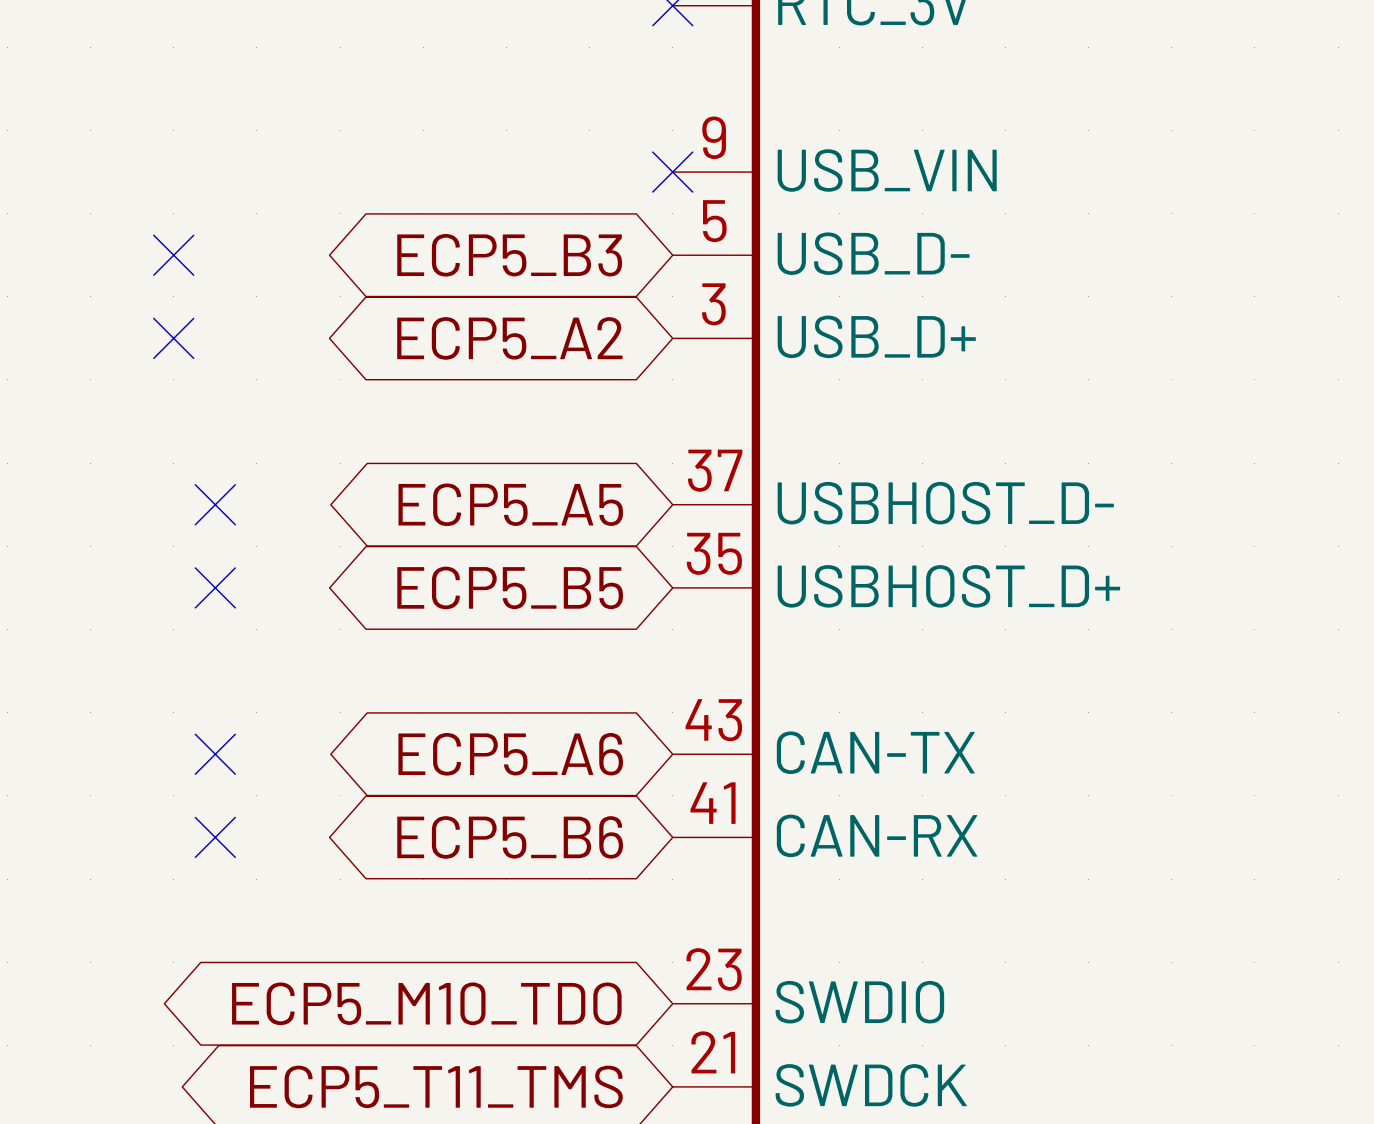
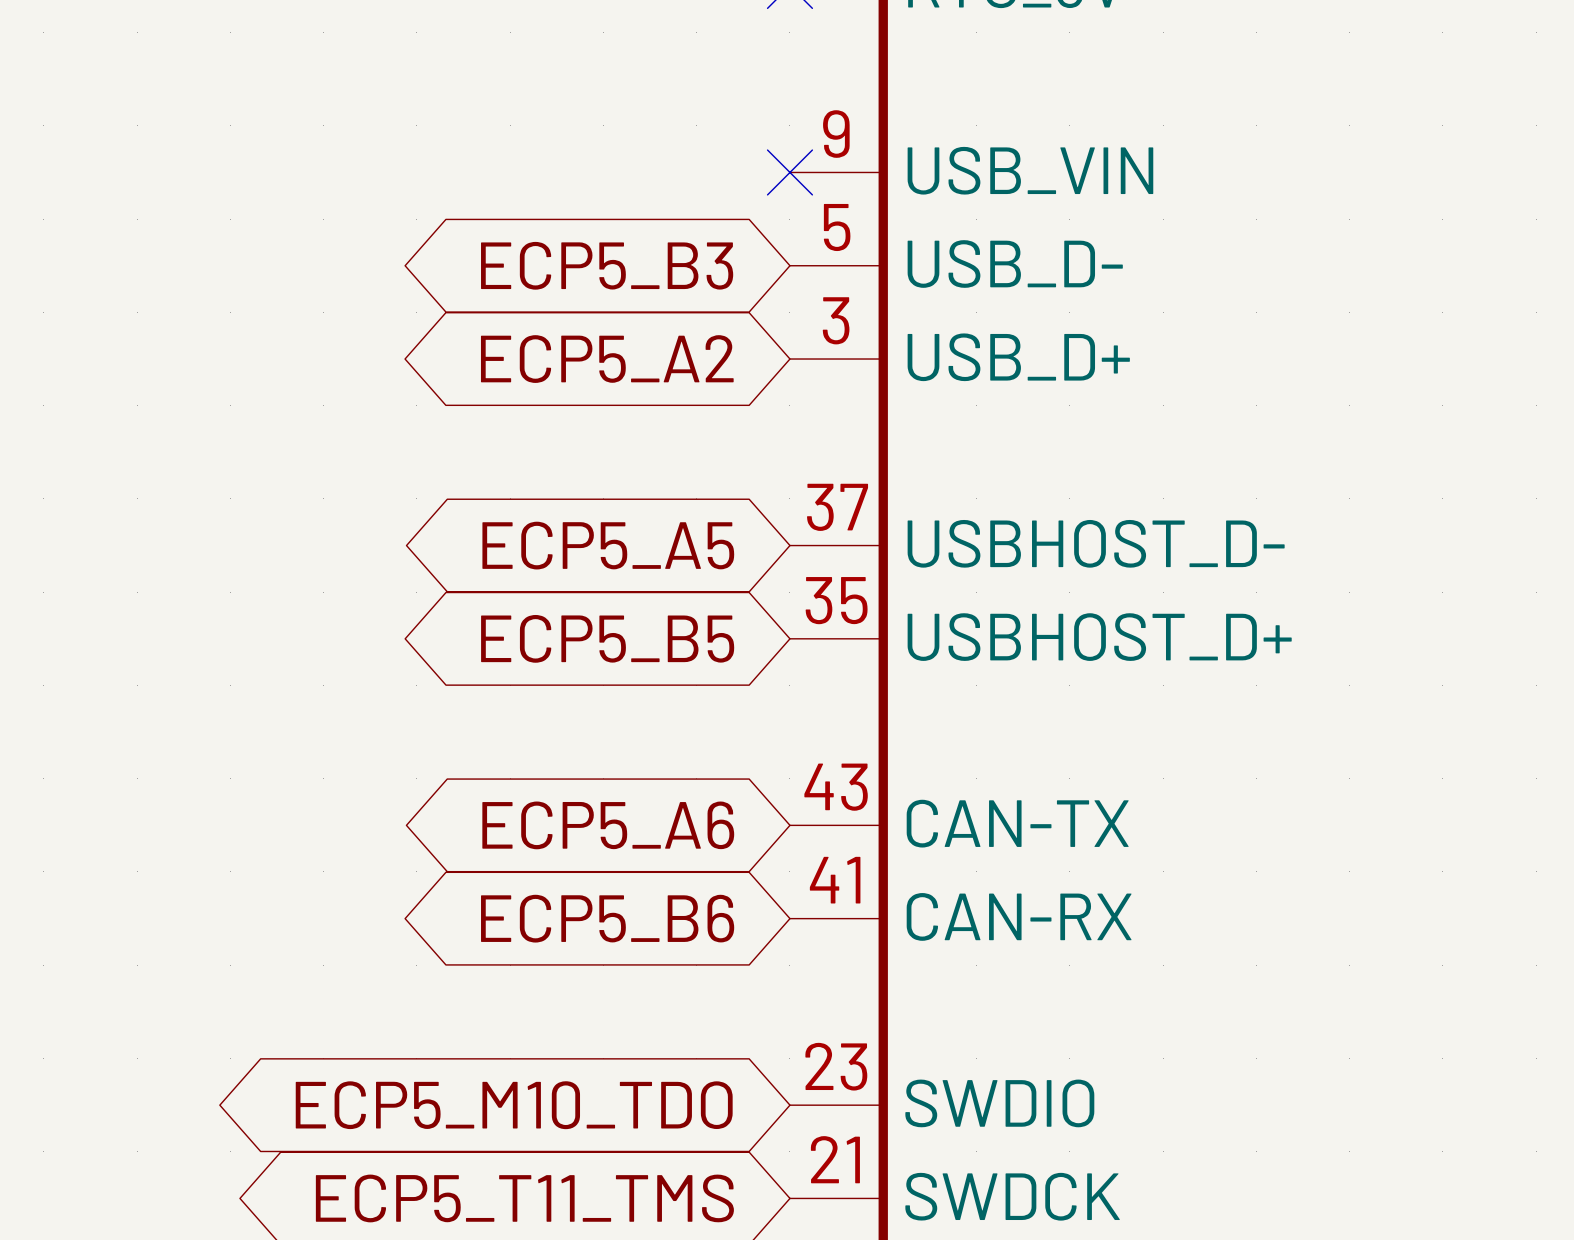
no-connect mark: (173, 255) -> none
no-connect mark: (173, 338) -> none
no-connect mark: (215, 504) -> none
no-connect mark: (215, 587) -> none
no-connect mark: (215, 754) -> none
no-connect mark: (215, 837) -> none

